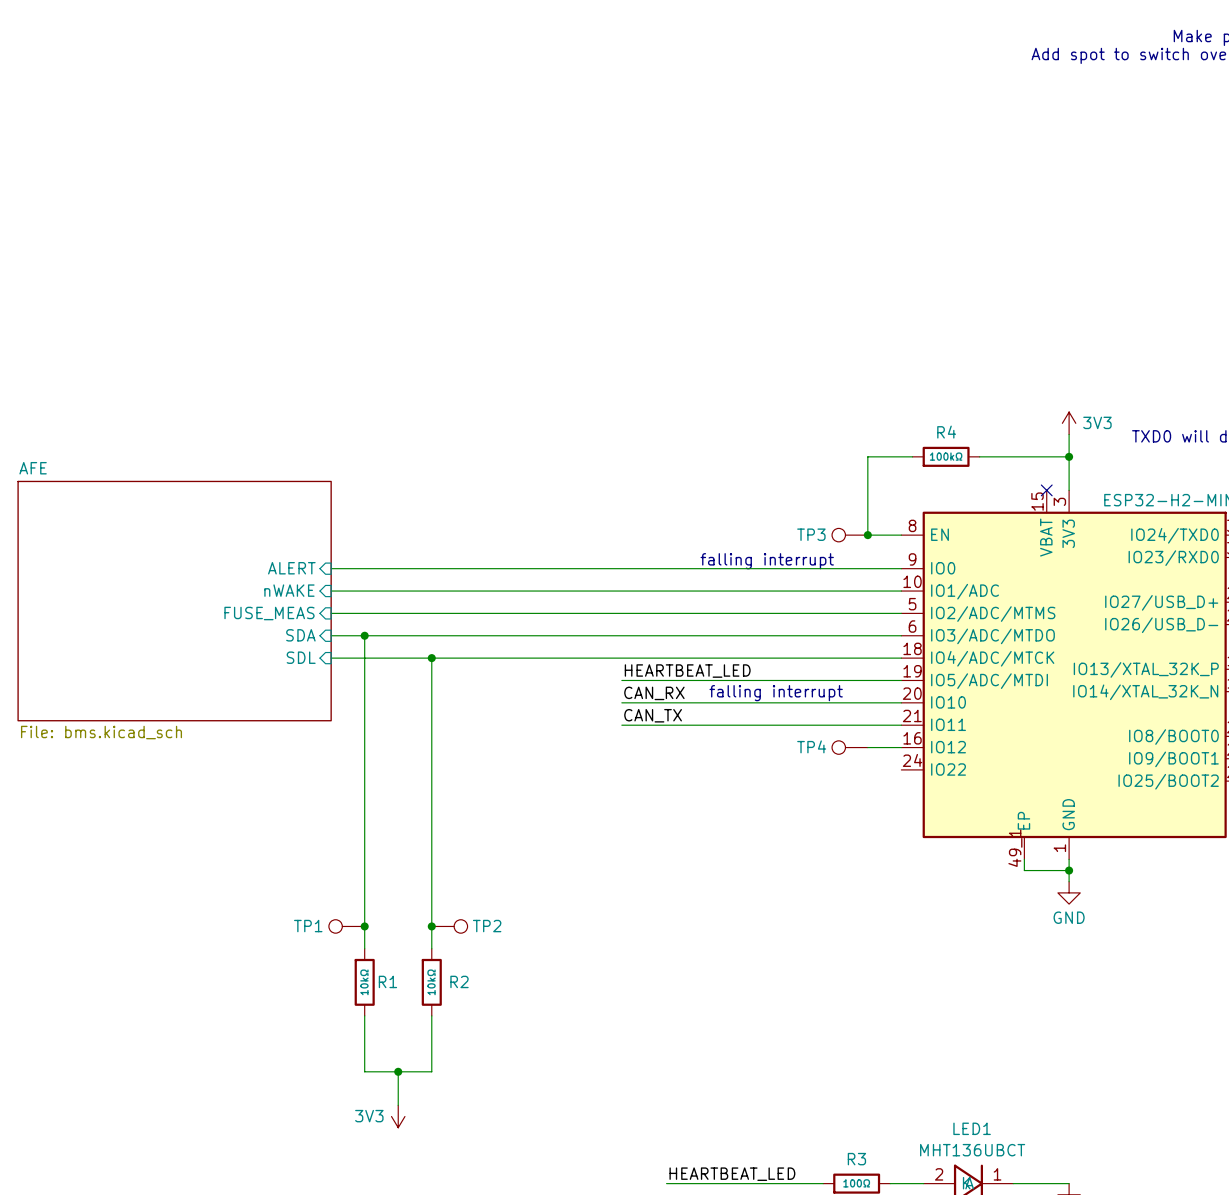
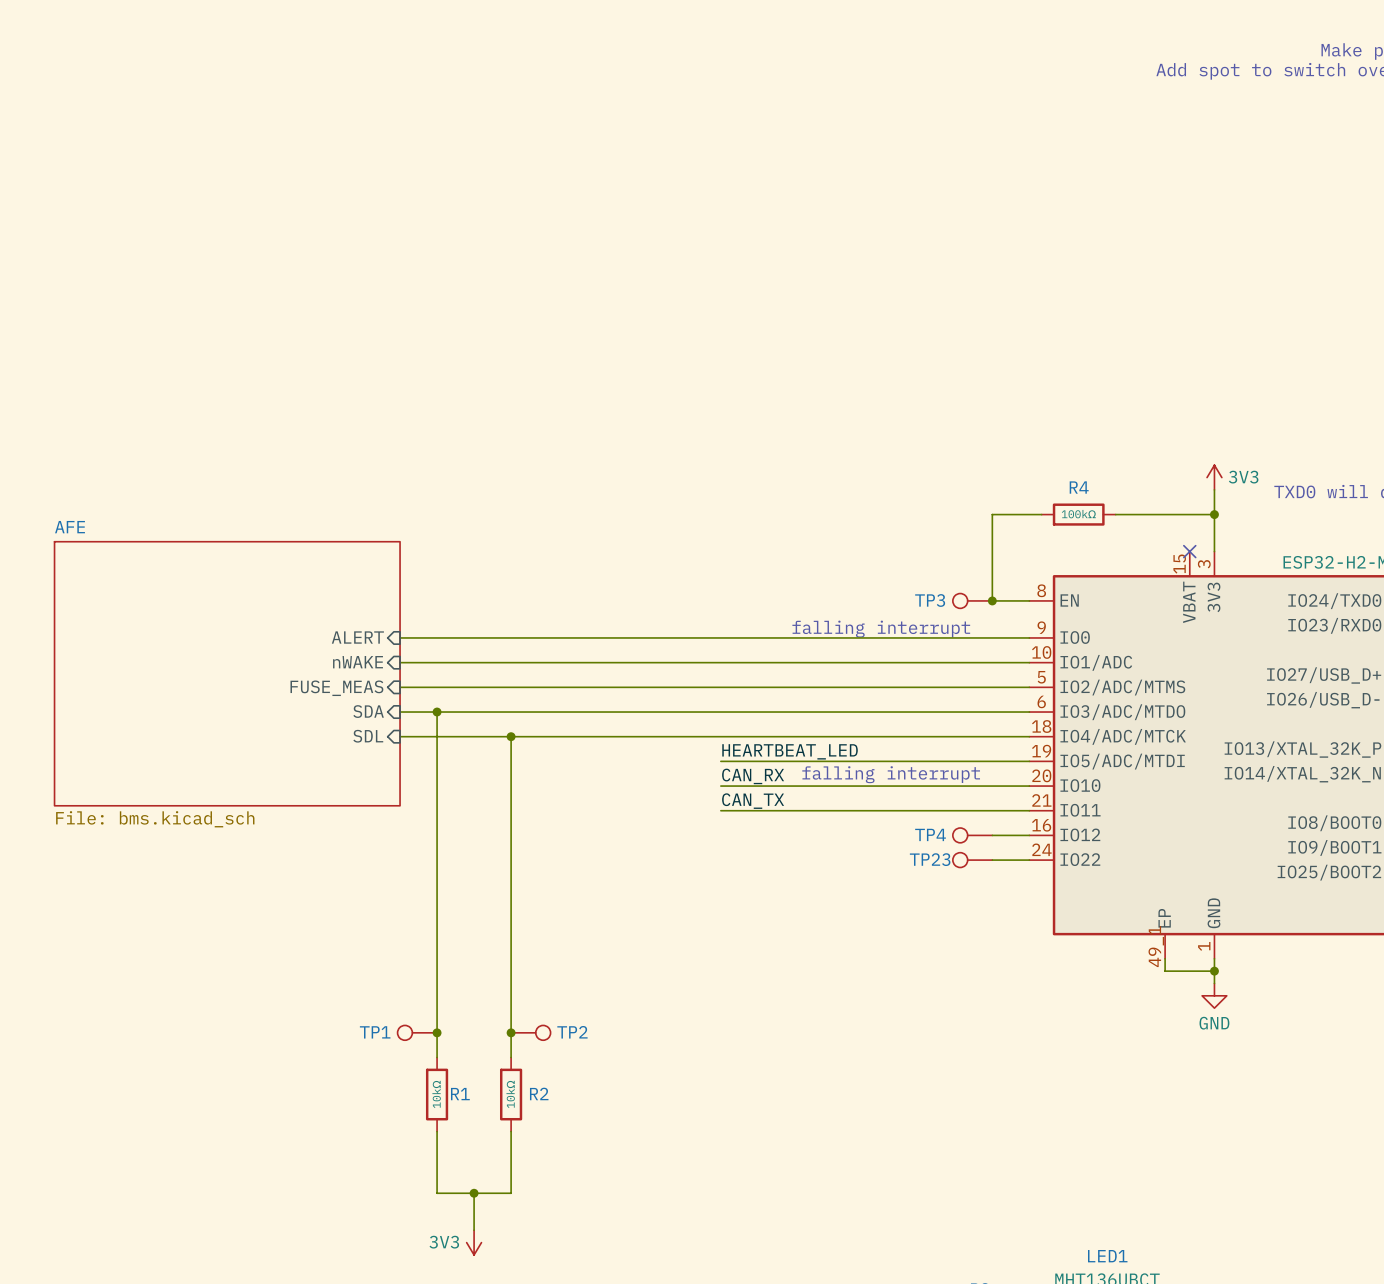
TP23: none -> (972, 860)
wire: none -> (992, 860) (1029, 860)

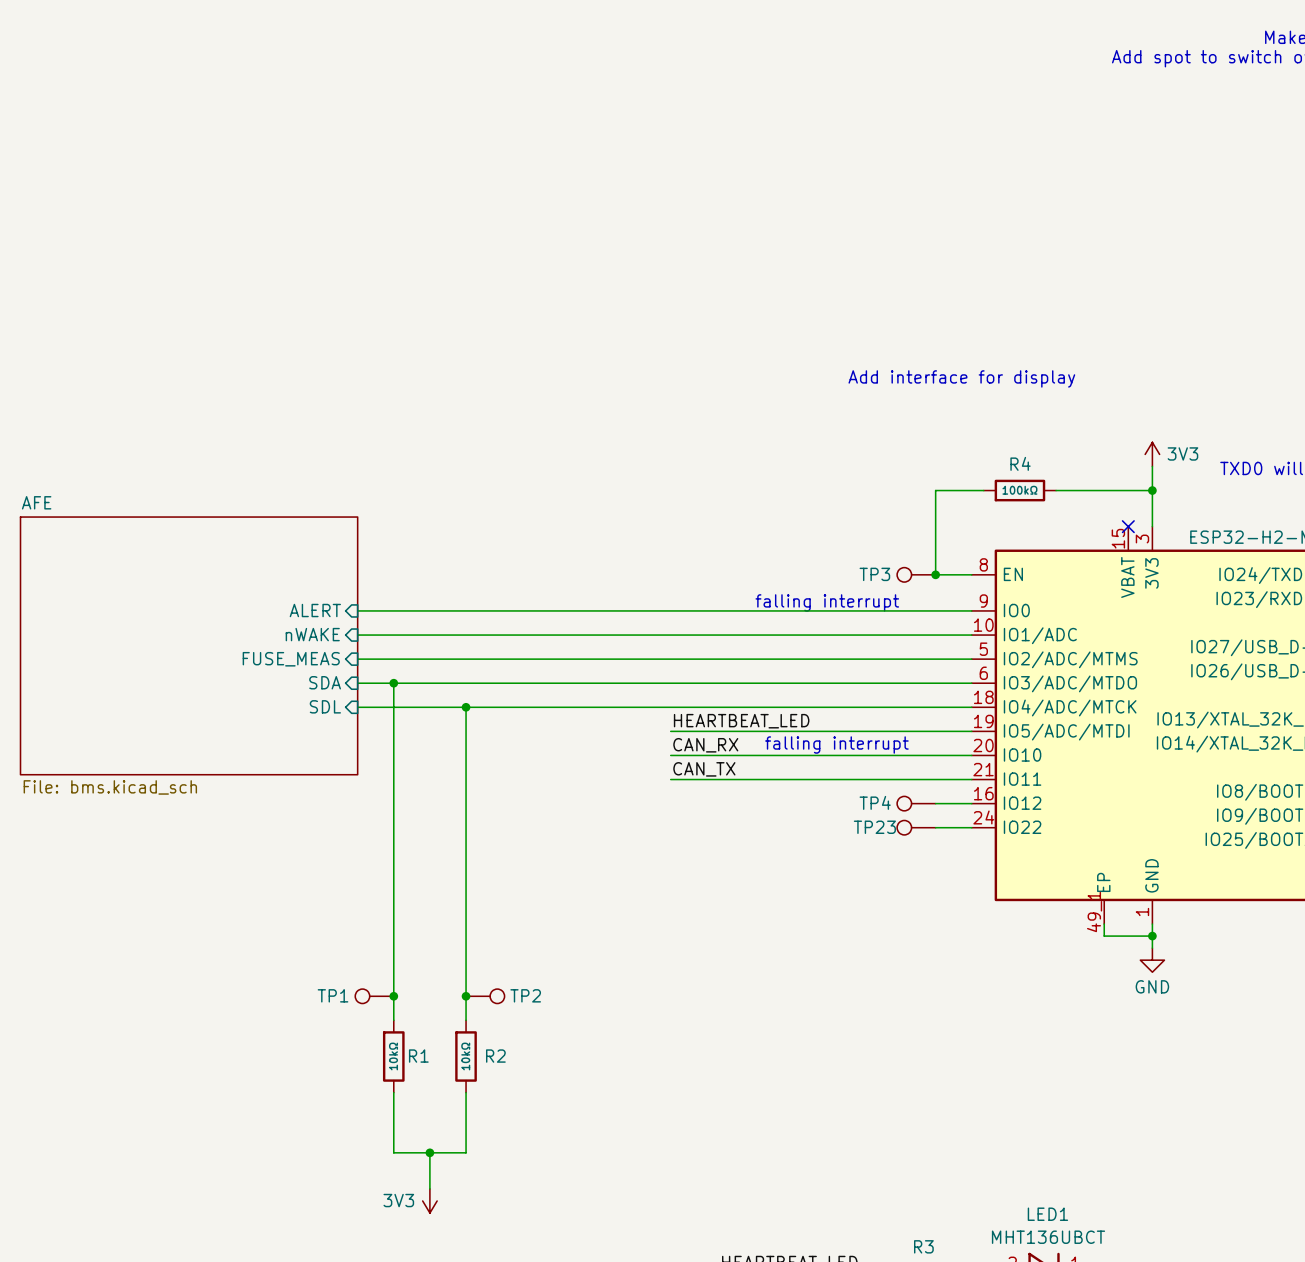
text: none -> Add interface for display (961, 378)

